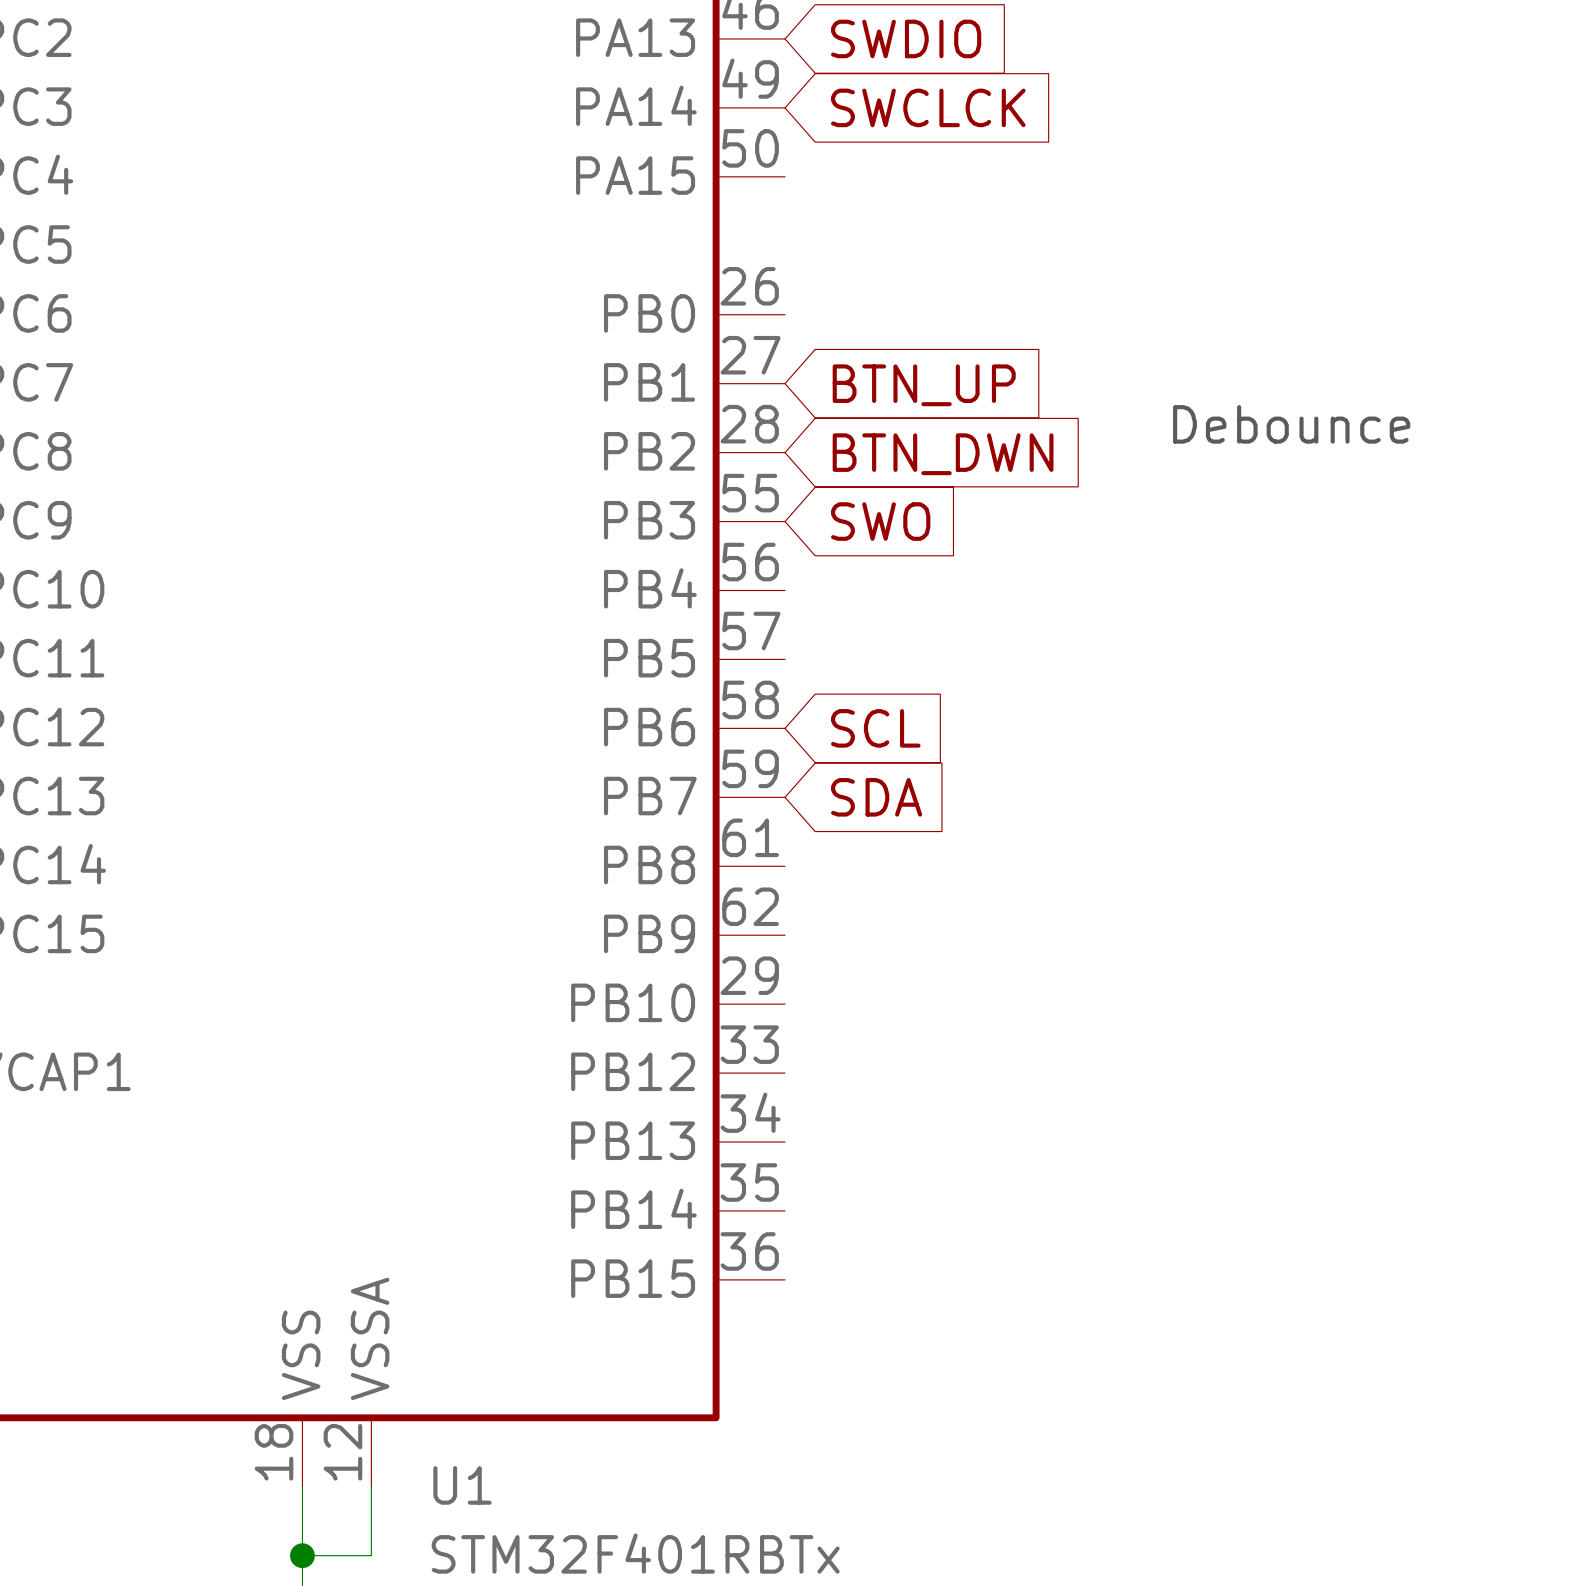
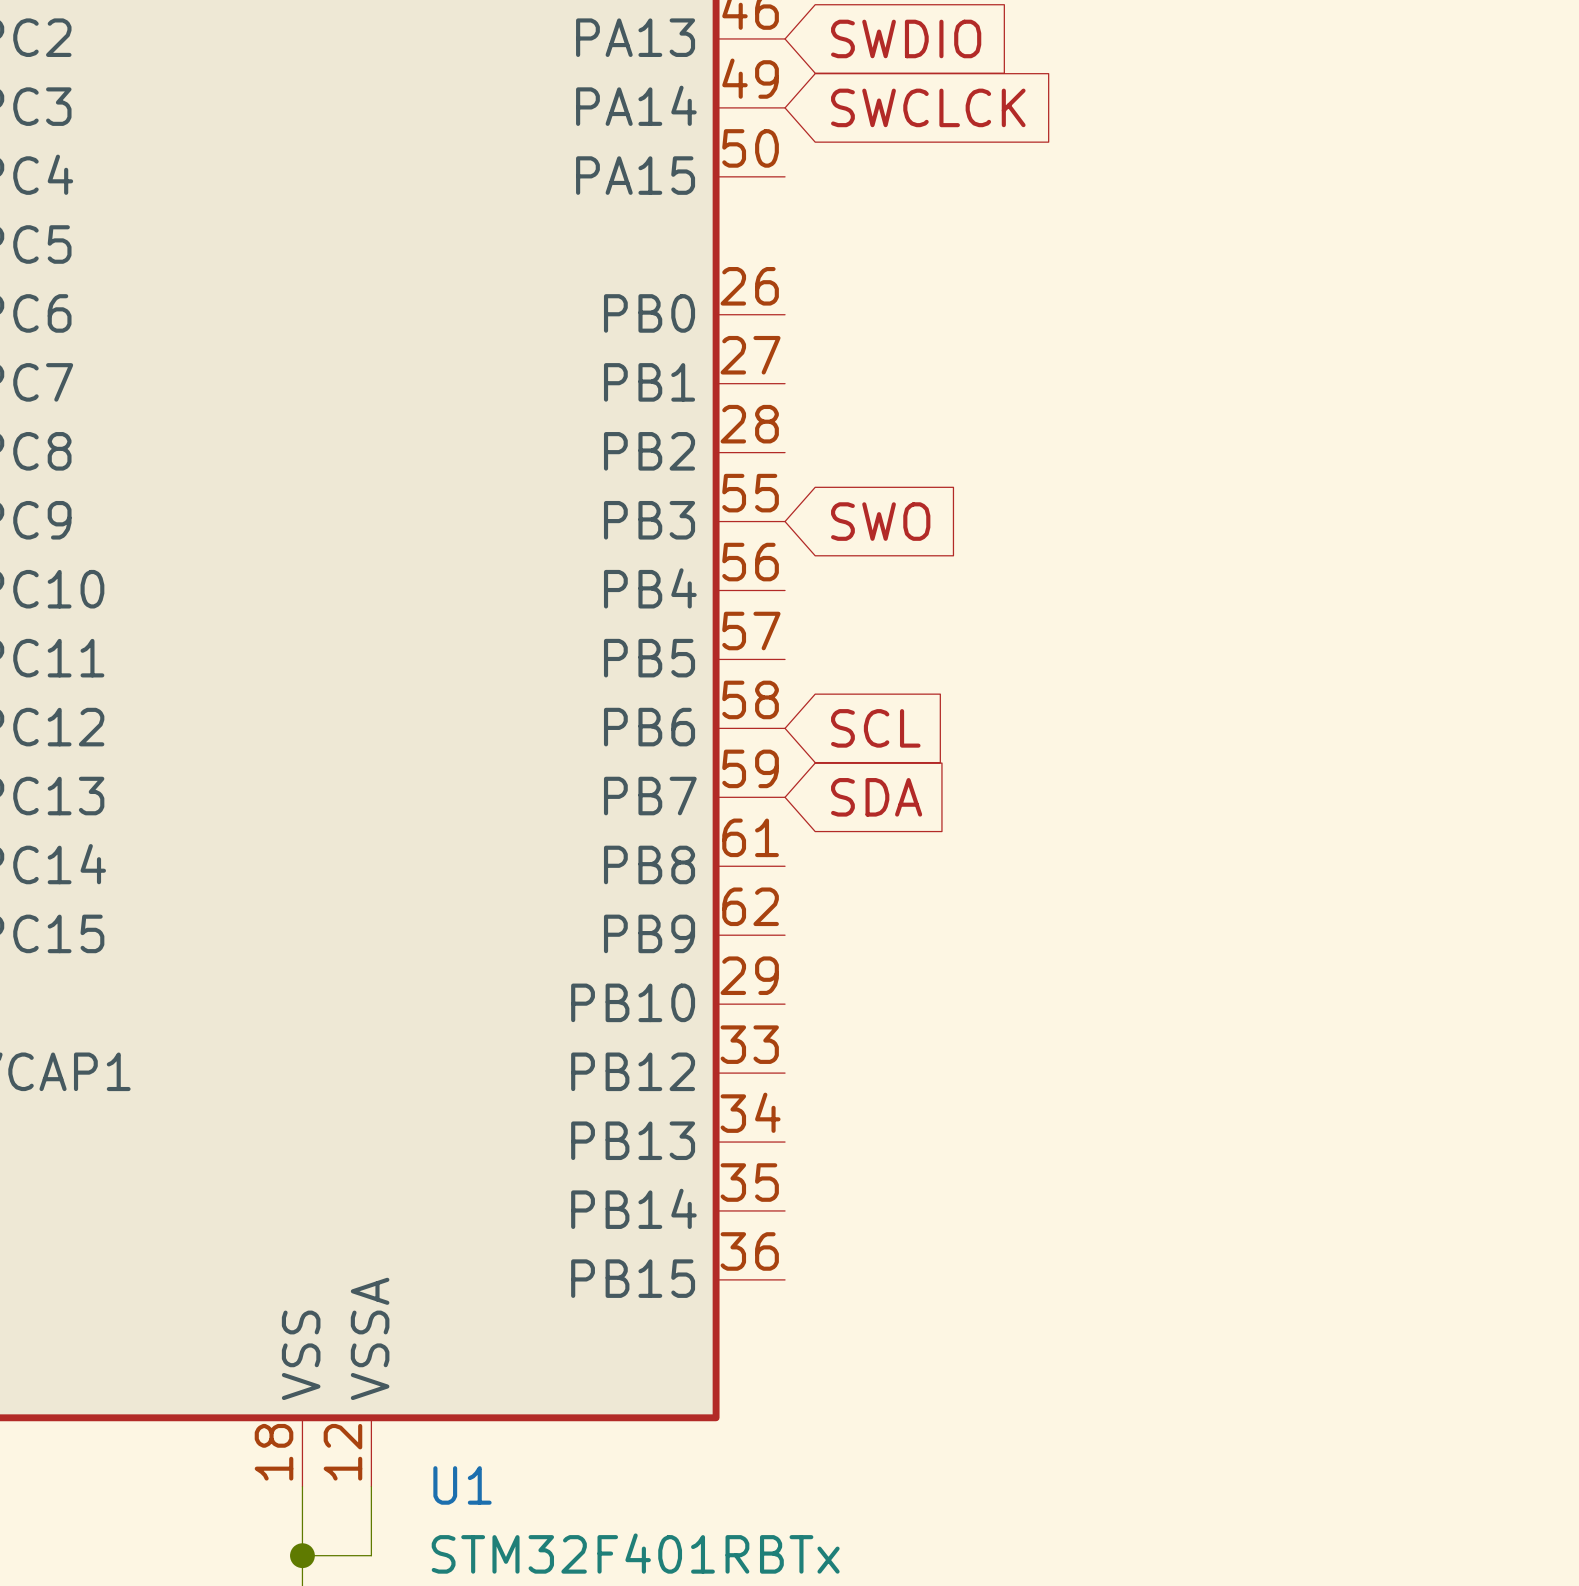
global label: BTN_UP (924, 385) -> none
text: Debounce (1291, 424) -> none
global label: BTN_DWN (943, 454) -> none

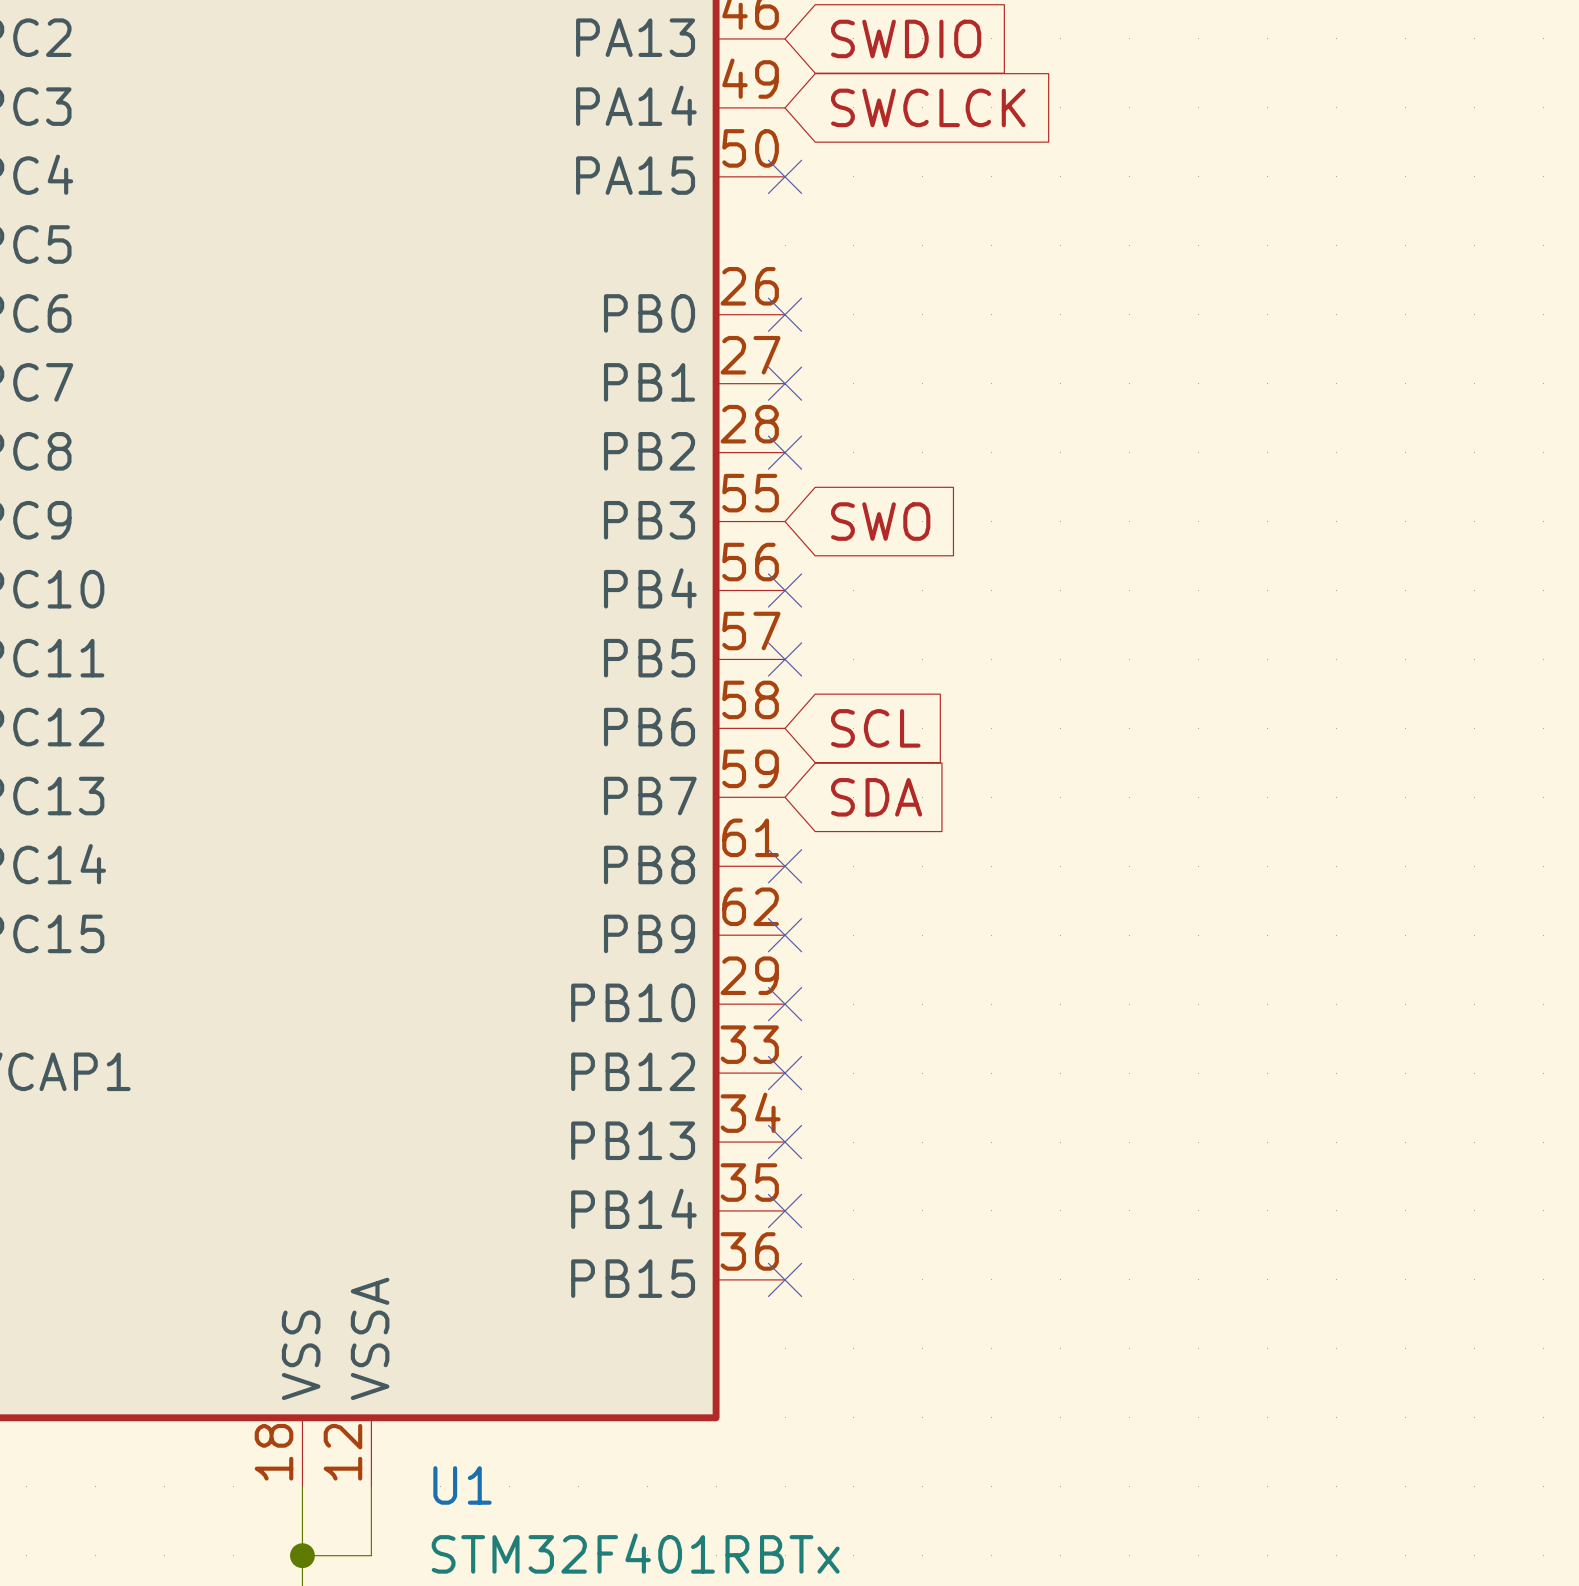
no-connect mark: none -> (785, 176)
no-connect mark: none -> (785, 314)
no-connect mark: none -> (785, 383)
no-connect mark: none -> (785, 452)
no-connect mark: none -> (785, 590)
no-connect mark: none -> (785, 659)
no-connect mark: none -> (785, 866)
no-connect mark: none -> (785, 935)
no-connect mark: none -> (785, 1004)
no-connect mark: none -> (785, 1073)
no-connect mark: none -> (785, 1142)
no-connect mark: none -> (785, 1210)
no-connect mark: none -> (785, 1279)

